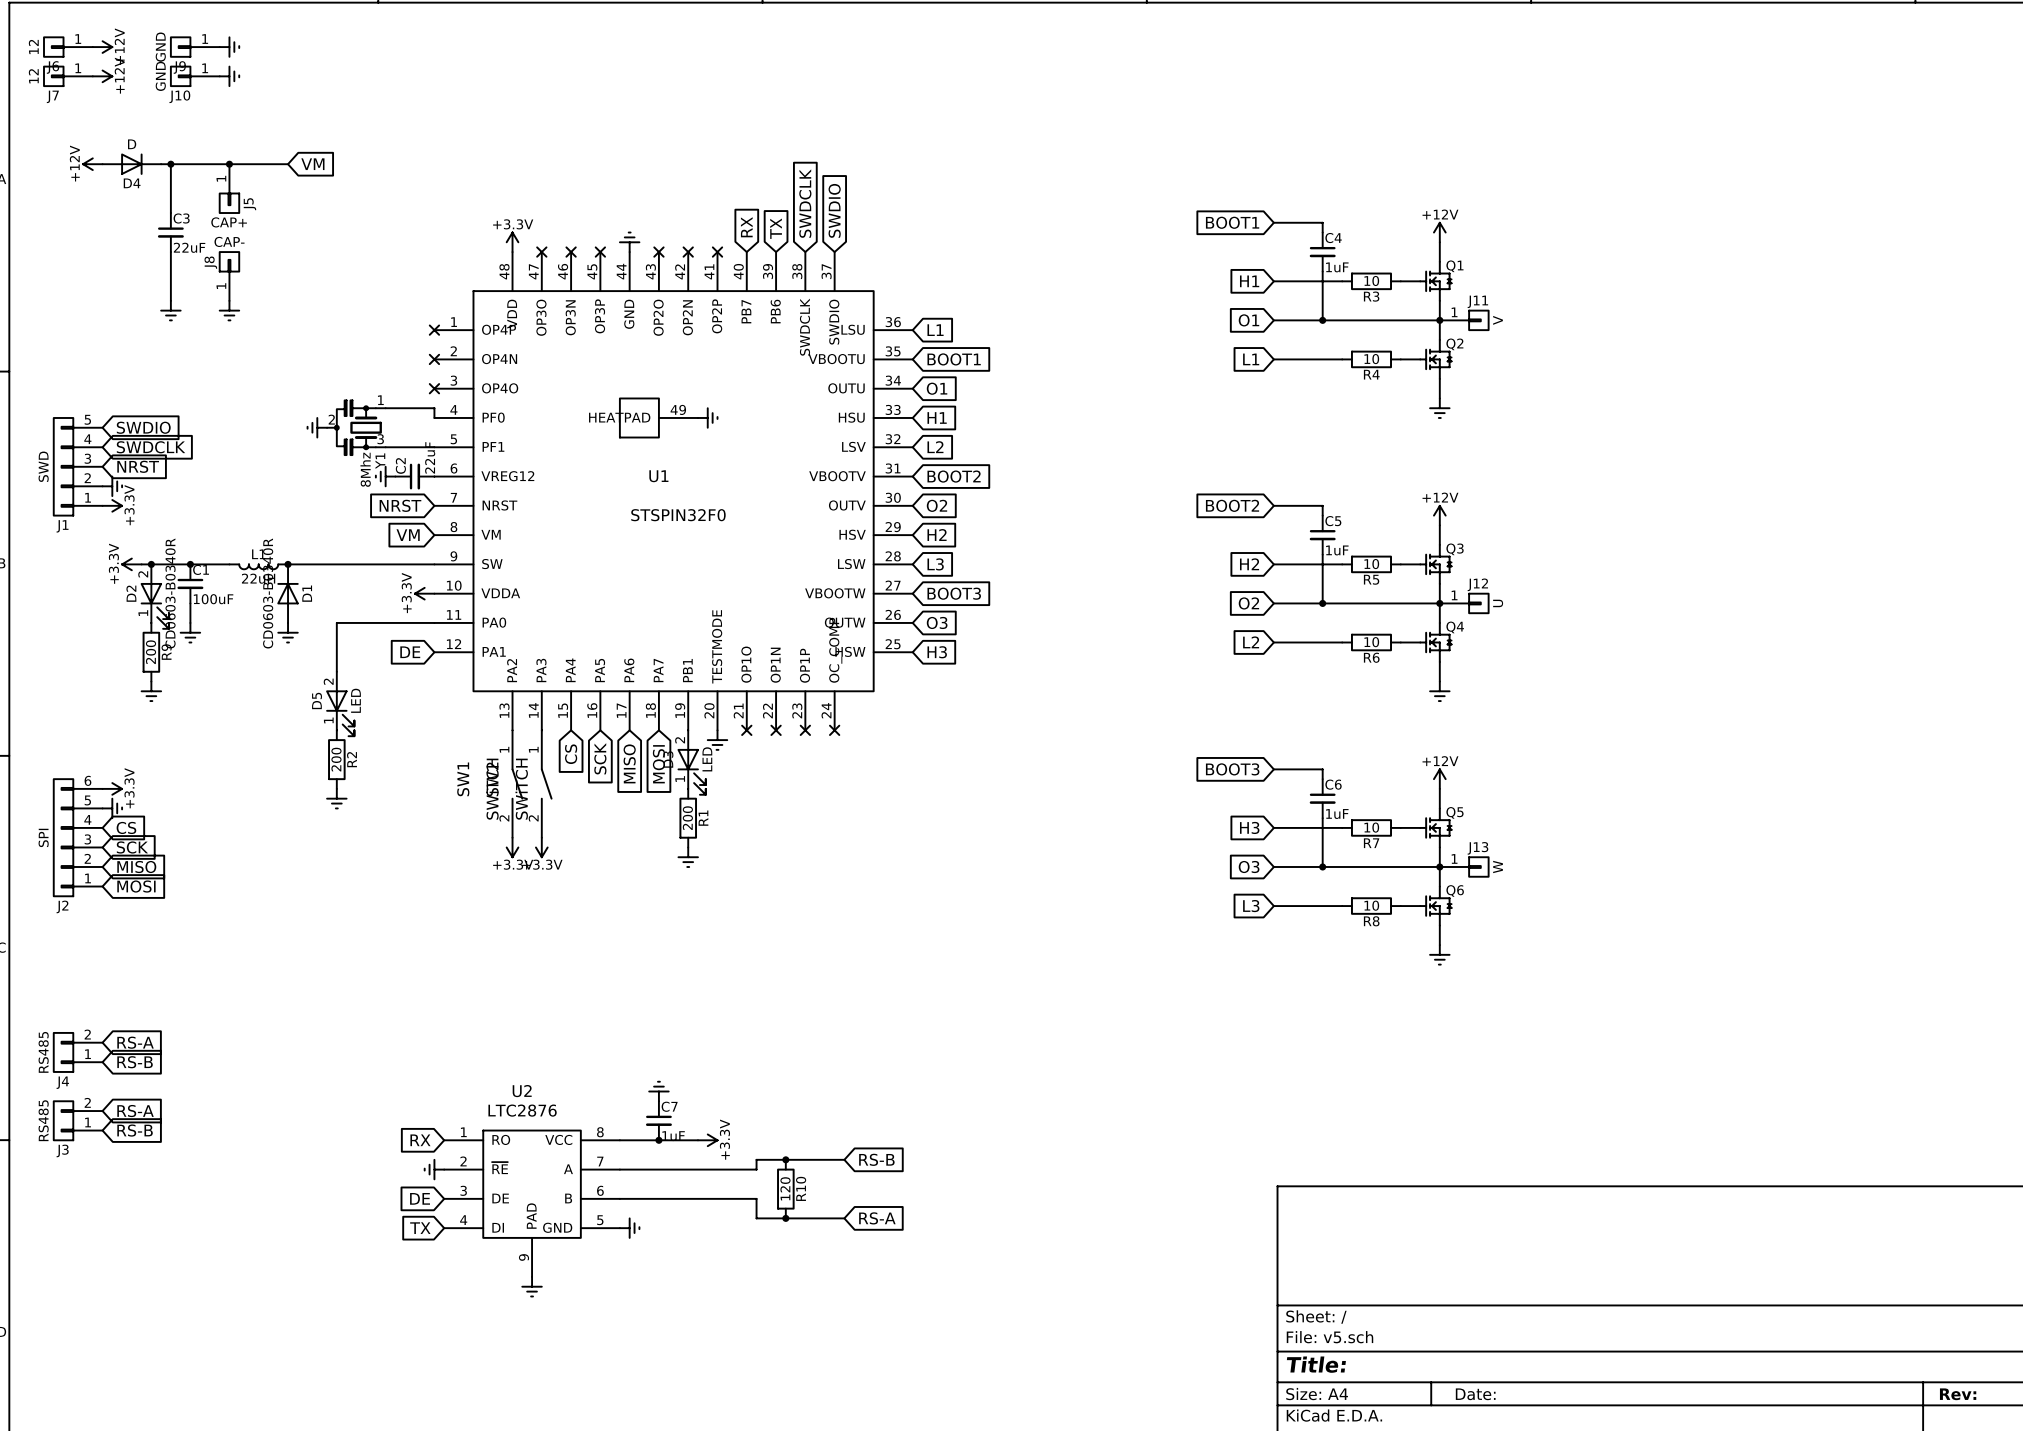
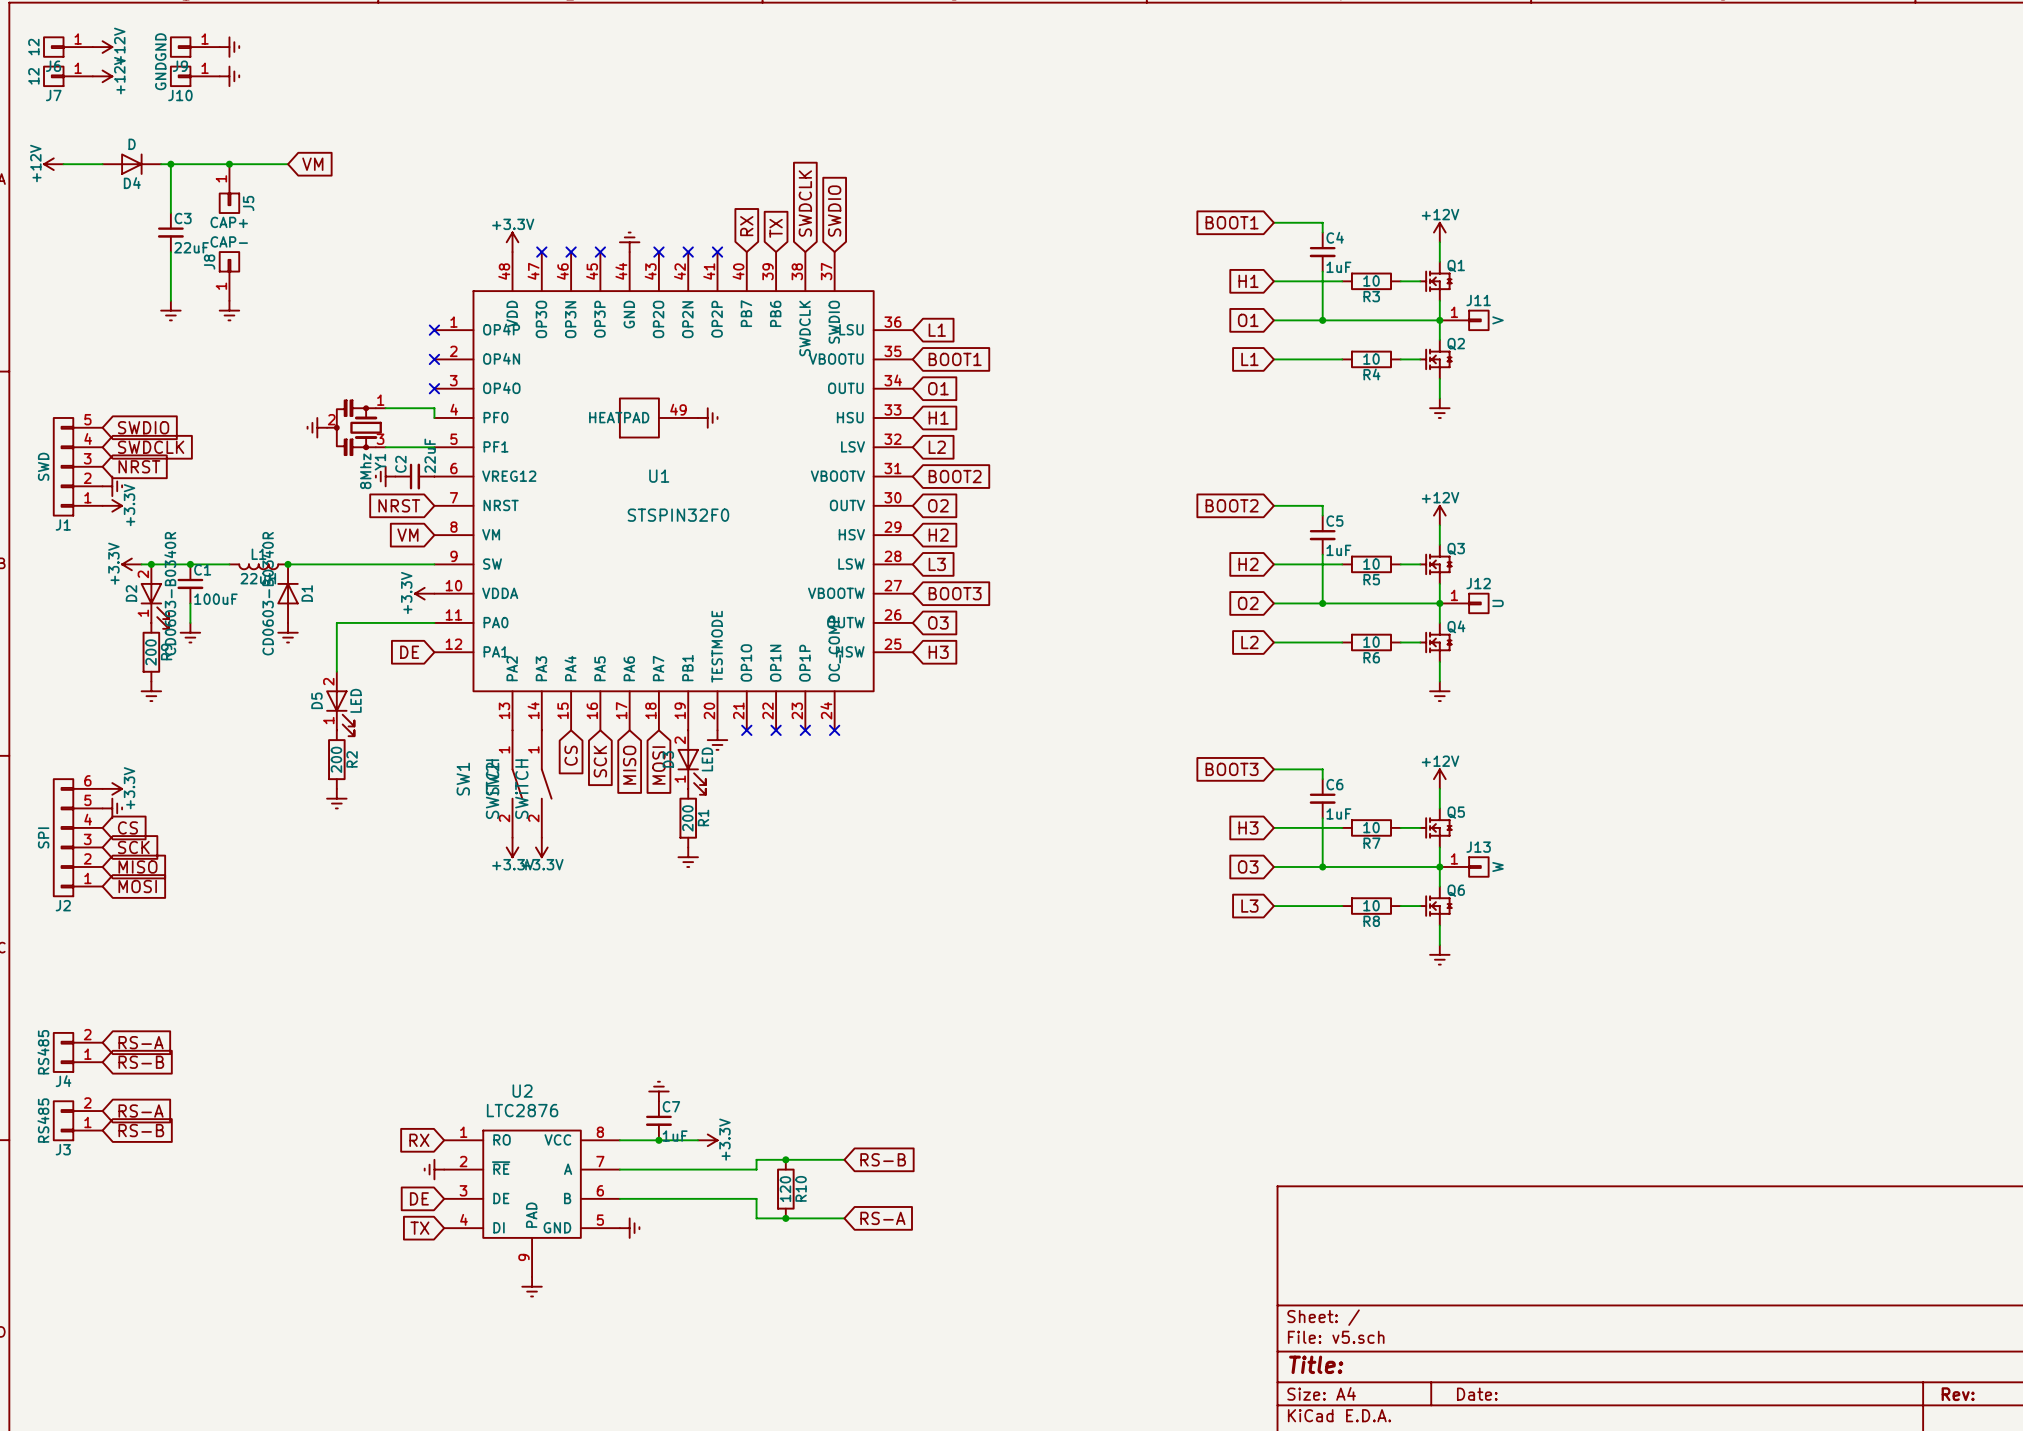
power symbol position: +12V (92, 164) -> +12V (53, 164)

